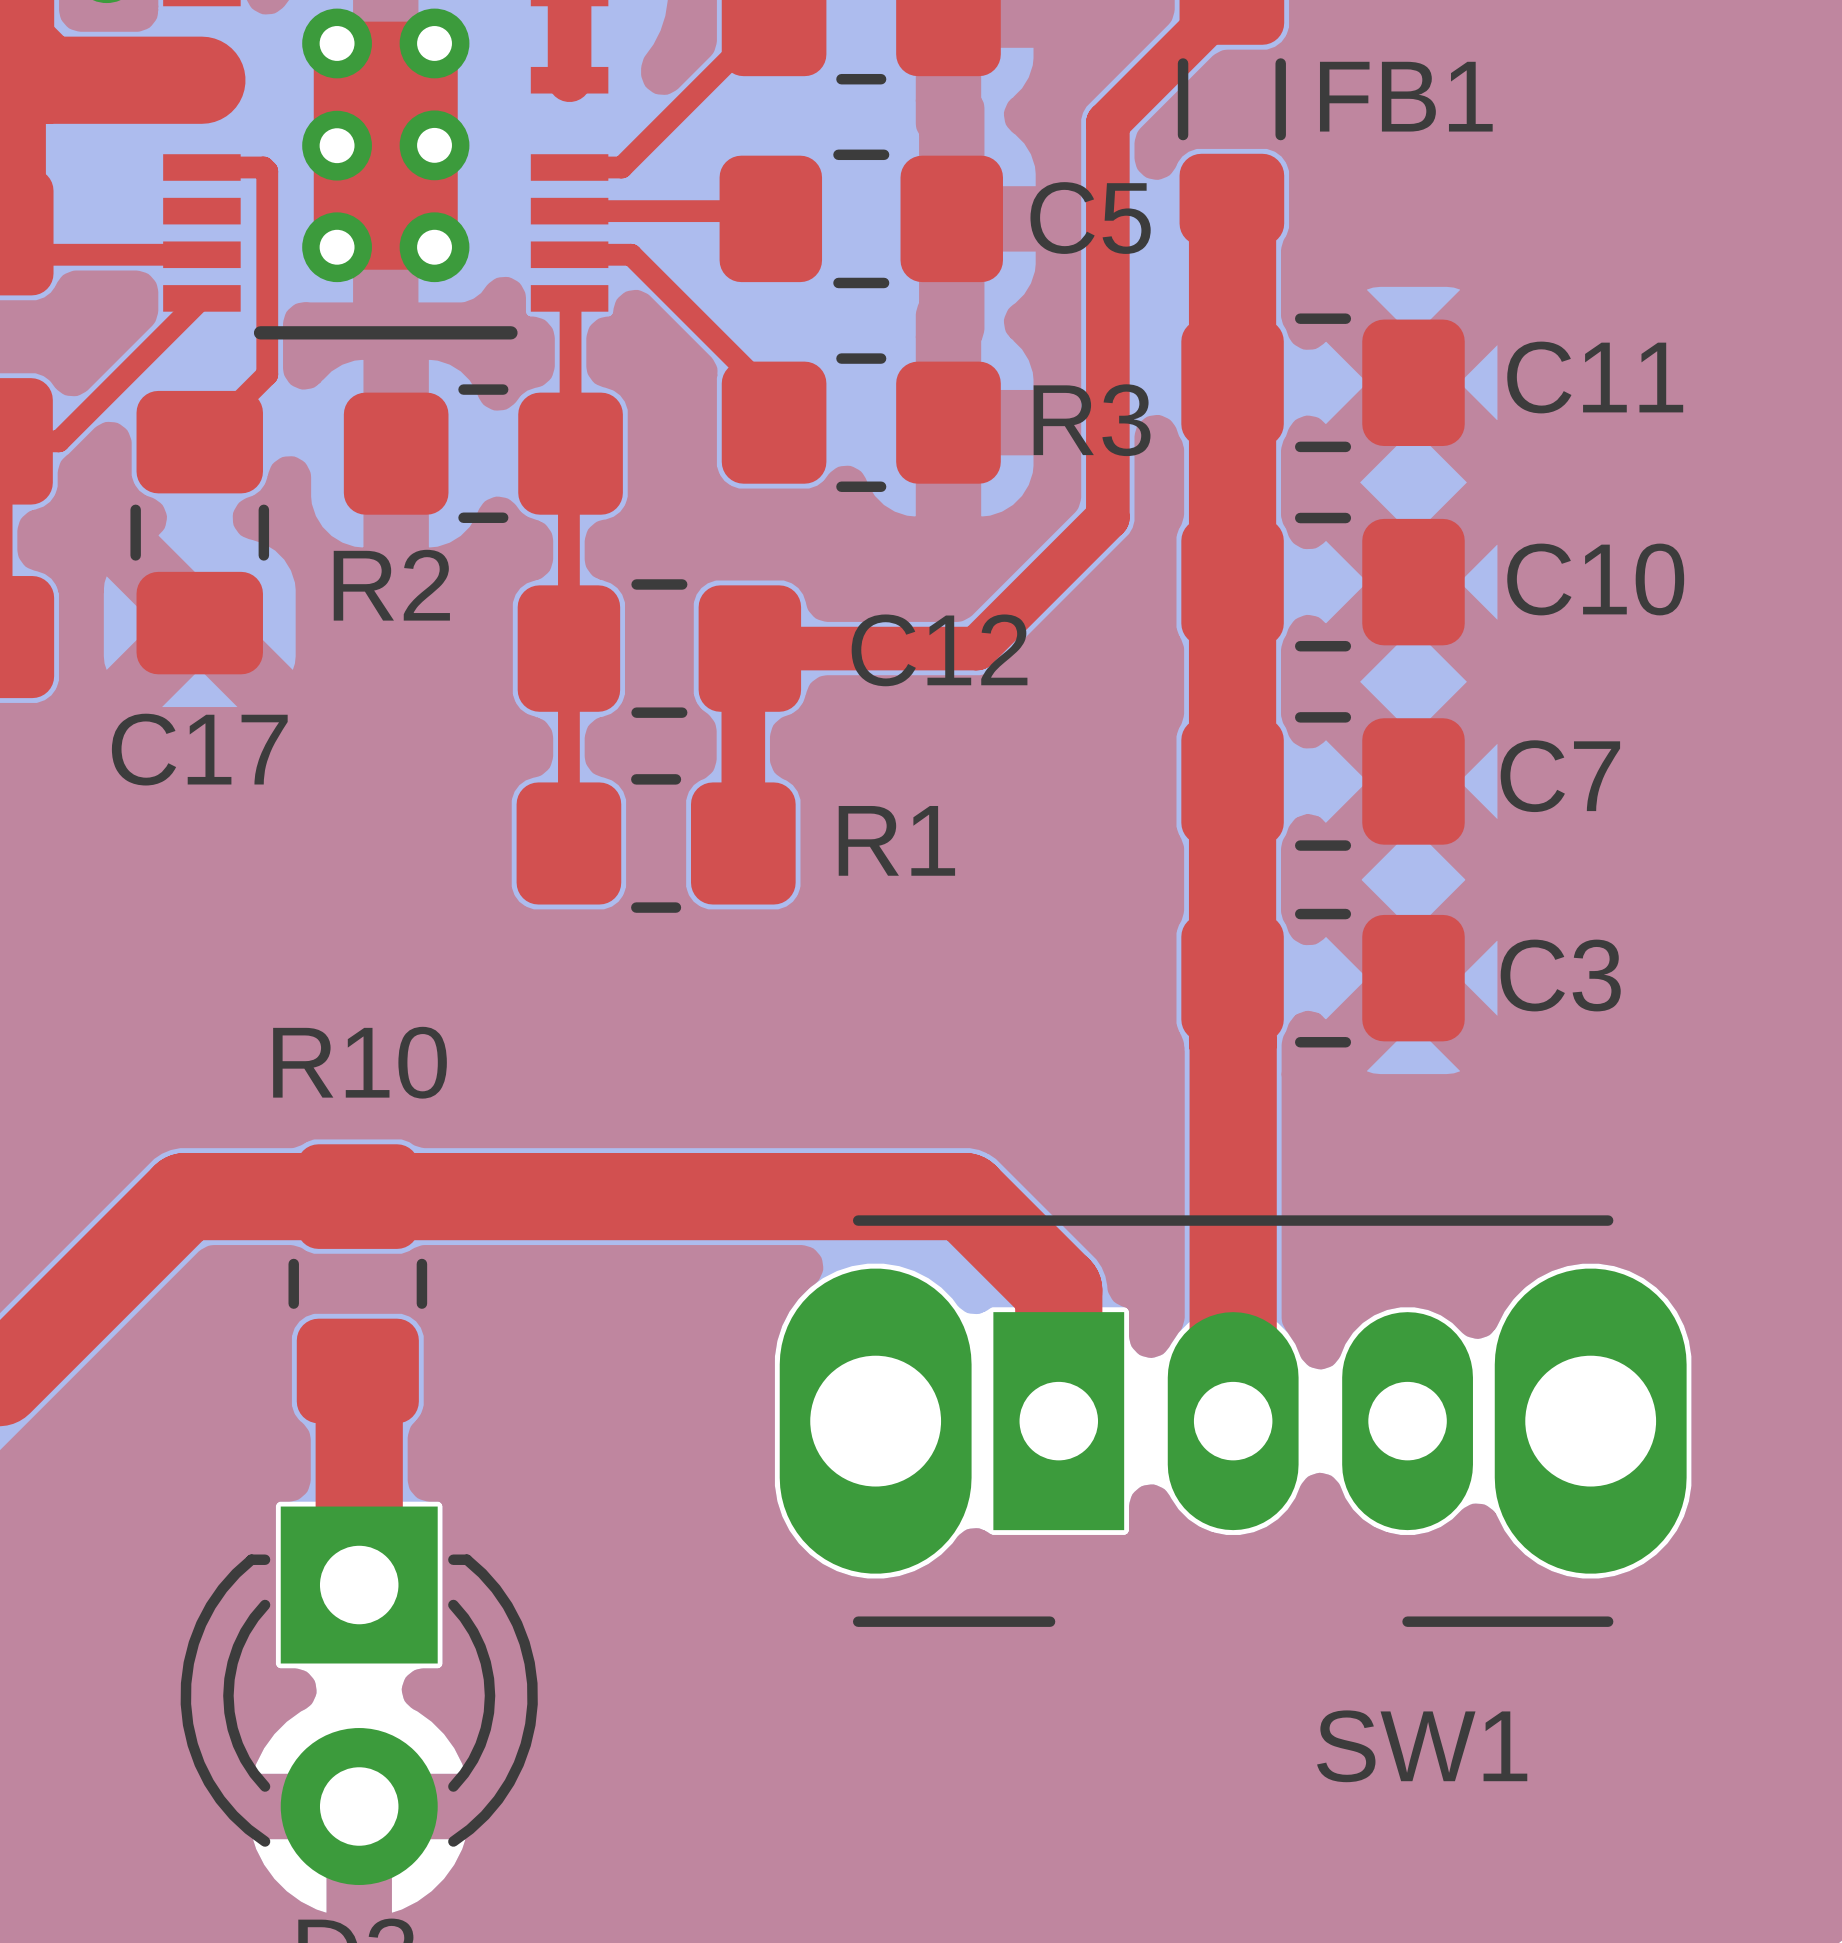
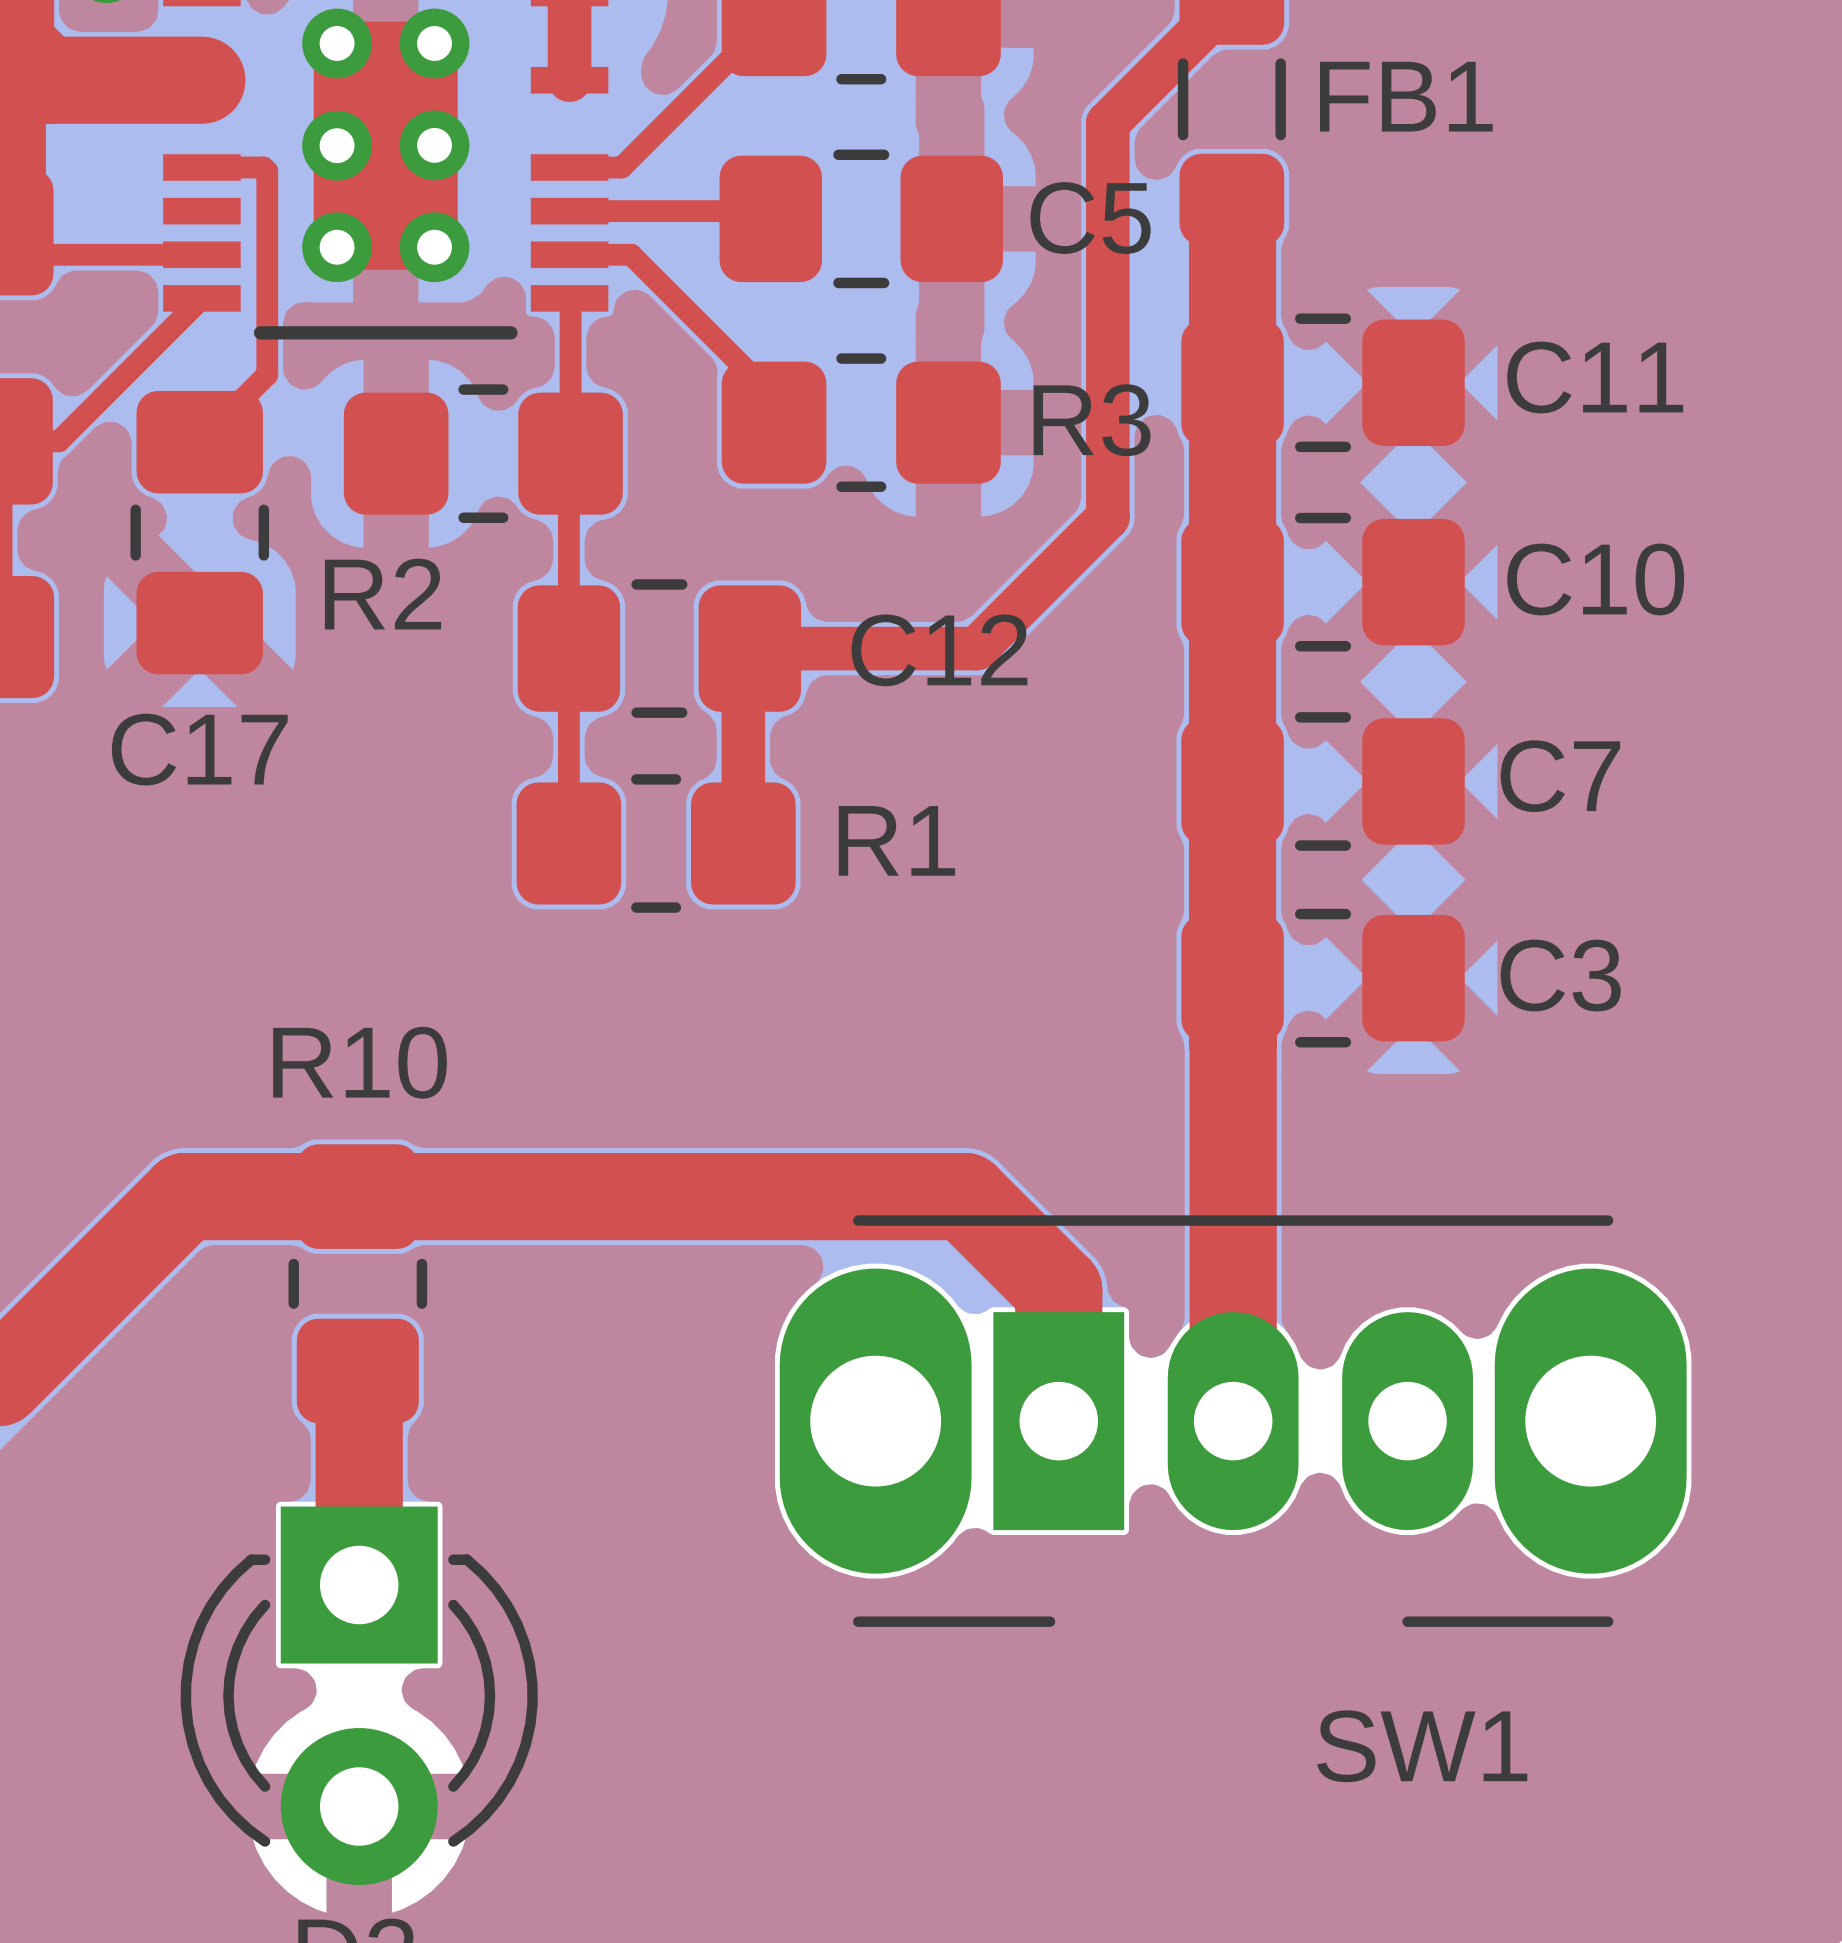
R2 name position: R2 (391, 585) -> R2 (382, 594)

